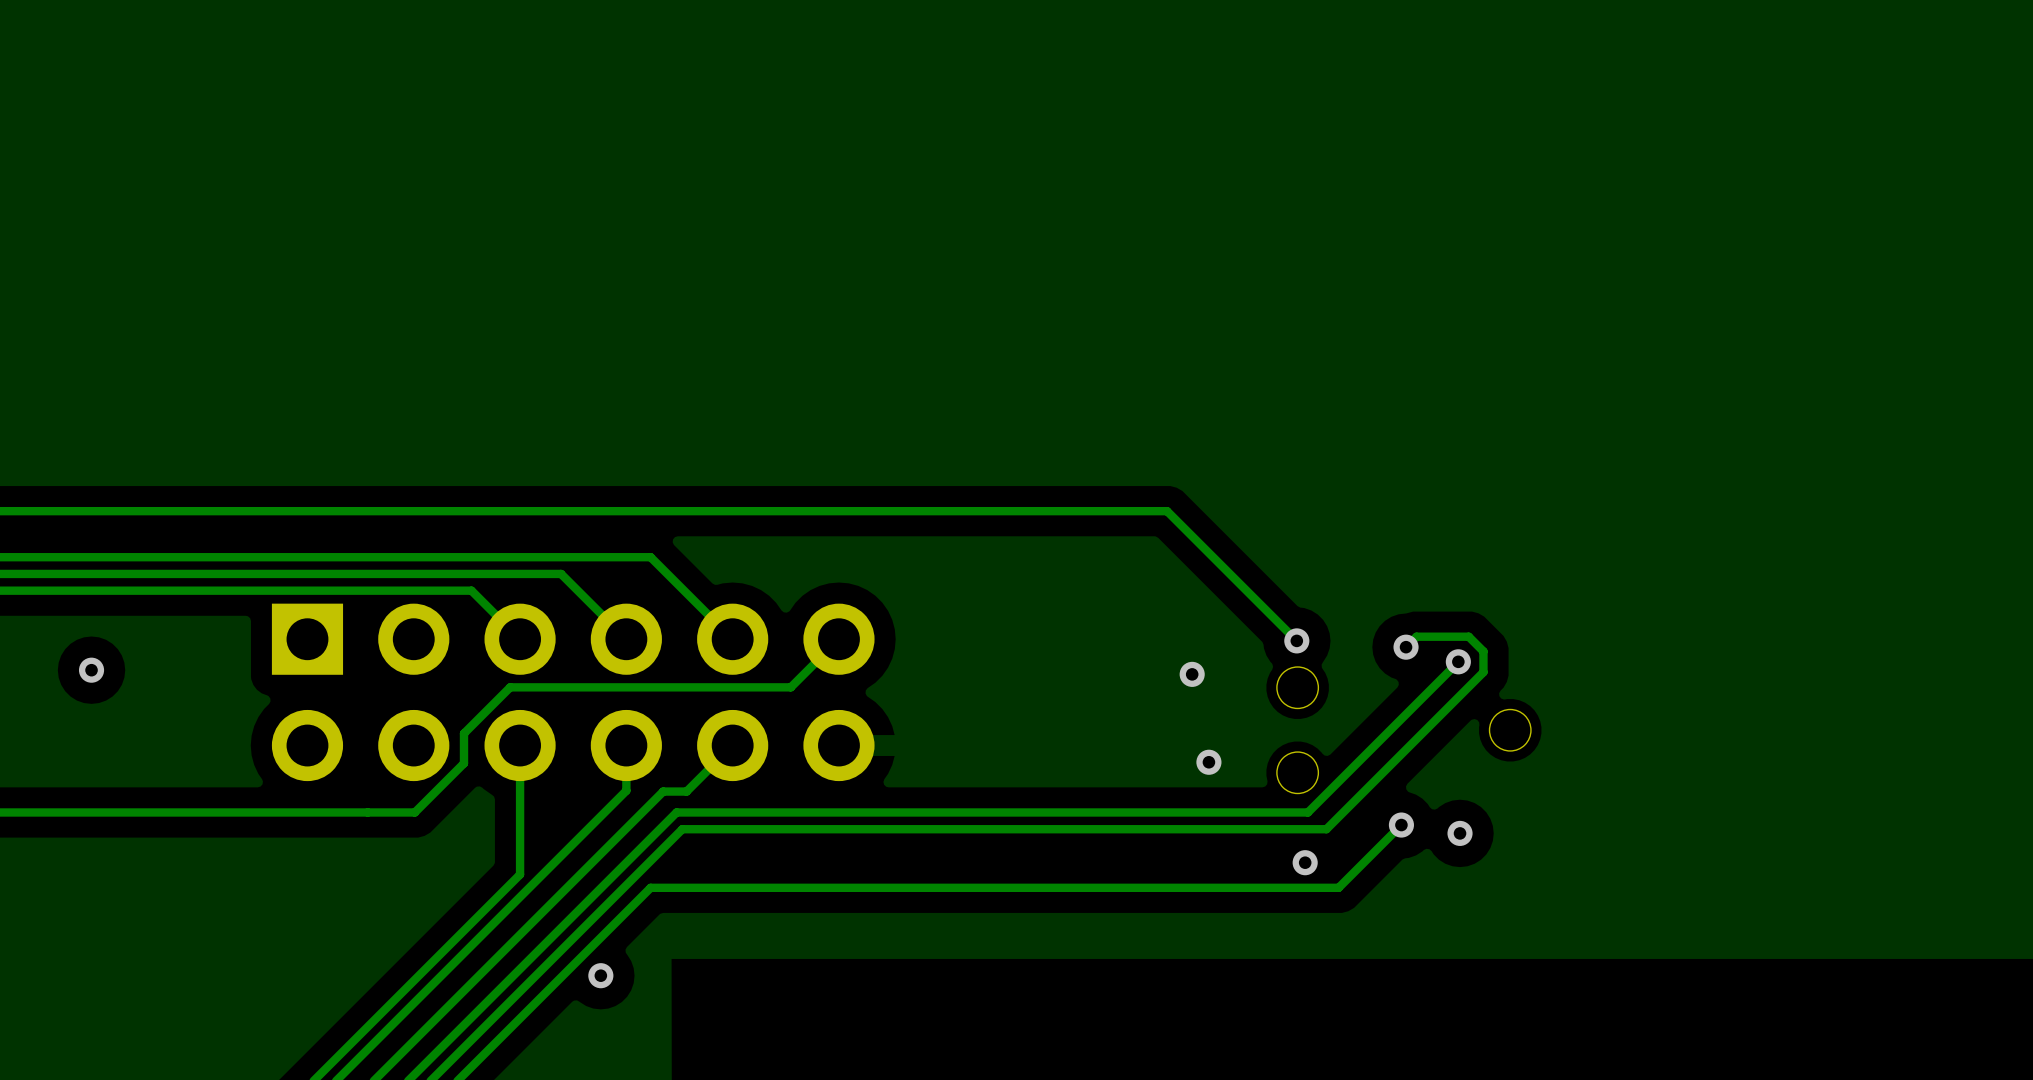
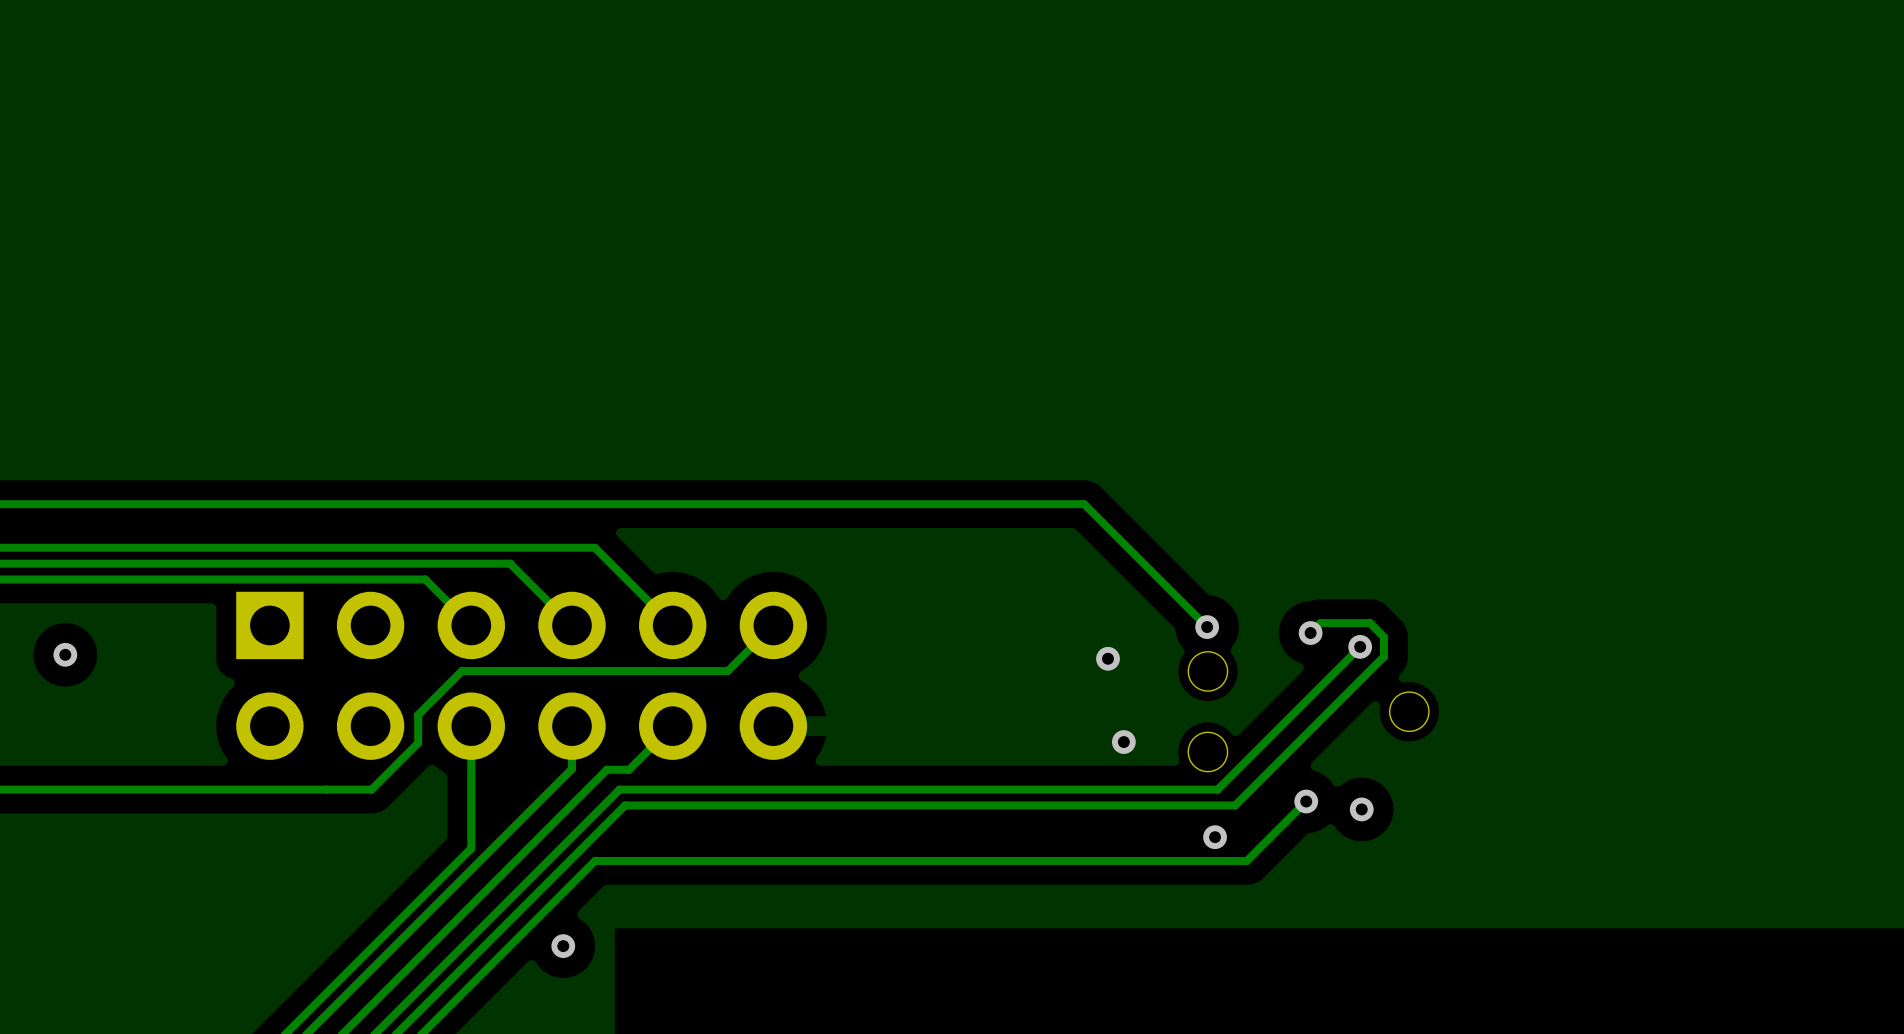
via position: (600, 975) -> (563, 946)

